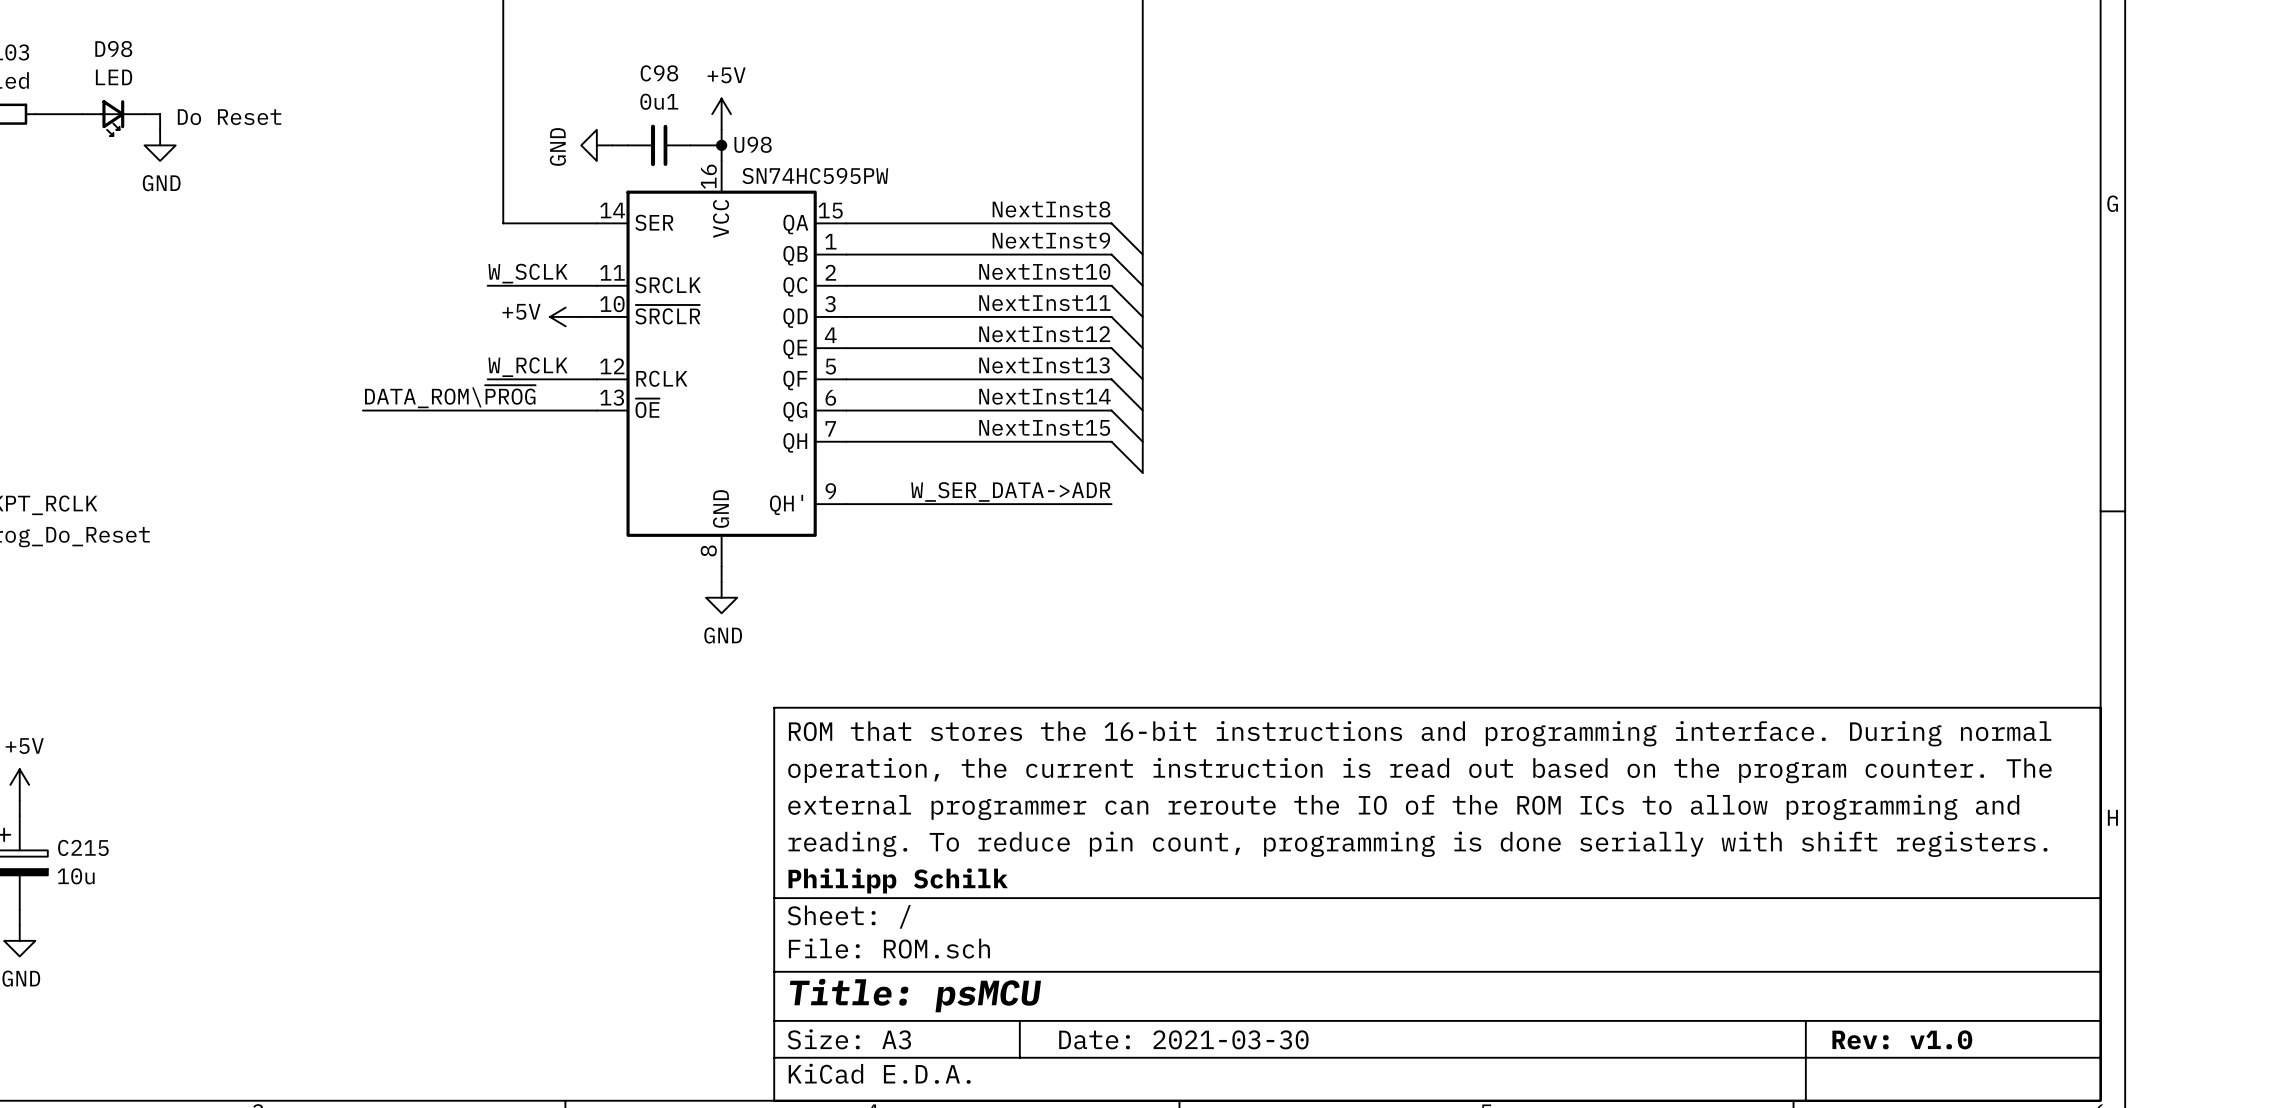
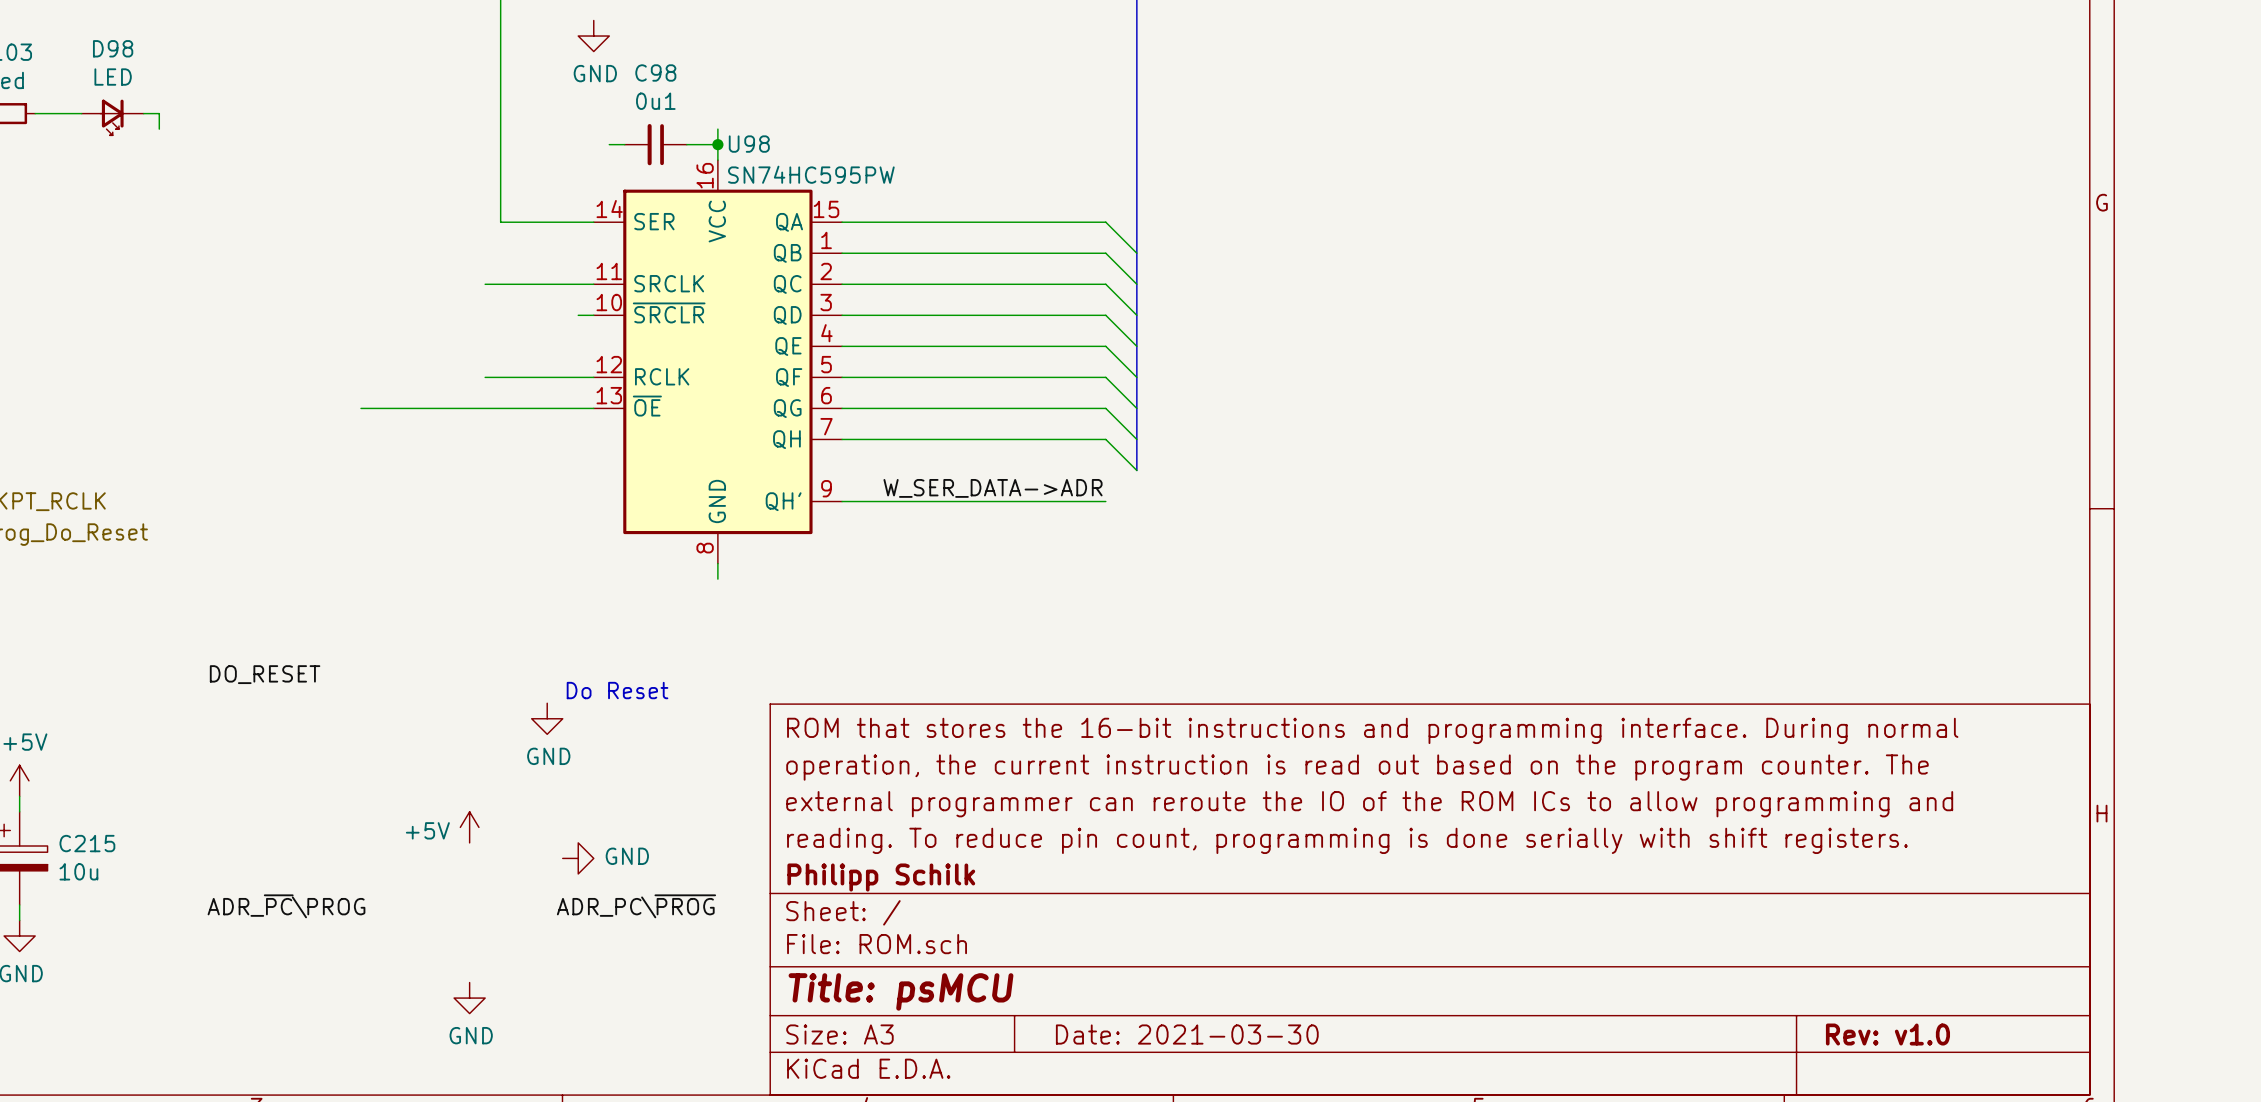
power symbol: none -> GND (593, 36)
power symbol: +5V (721, 114) -> none
text: Do Reset (229, 117) -> none
power symbol: GND (160, 145) -> none
power symbol: GND (596, 145) -> none
label: NextInst8 (1051, 209) -> none
label: NextInst9 (1051, 240) -> none
label: NextInst10 (1044, 271) -> none
label: W_SCLK (528, 273) -> none
label: NextInst11 (1044, 303) -> none
power symbol: +5V (565, 316) -> none
label: NextInst12 (1044, 334) -> none
label: NextInst13 (1044, 365) -> none
label: W_RCLK (528, 367) -> none
label: DATA_ROM\~{PROG} (450, 396) -> none
label: NextInst14 (1044, 396) -> none
label: NextInst15 (1044, 427) -> none
power symbol: GND (721, 597) -> none
label: none -> DO_RESET (265, 674)
text: none -> Do Reset (617, 690)
power symbol: none -> GND (547, 718)
power symbol: none -> +5V (469, 827)
power symbol: none -> GND (578, 858)
label: none -> ADR_~{PC}\PROG (286, 906)
label: none -> ADR_PC\~{PROG} (636, 906)
power symbol: none -> GND (469, 998)

